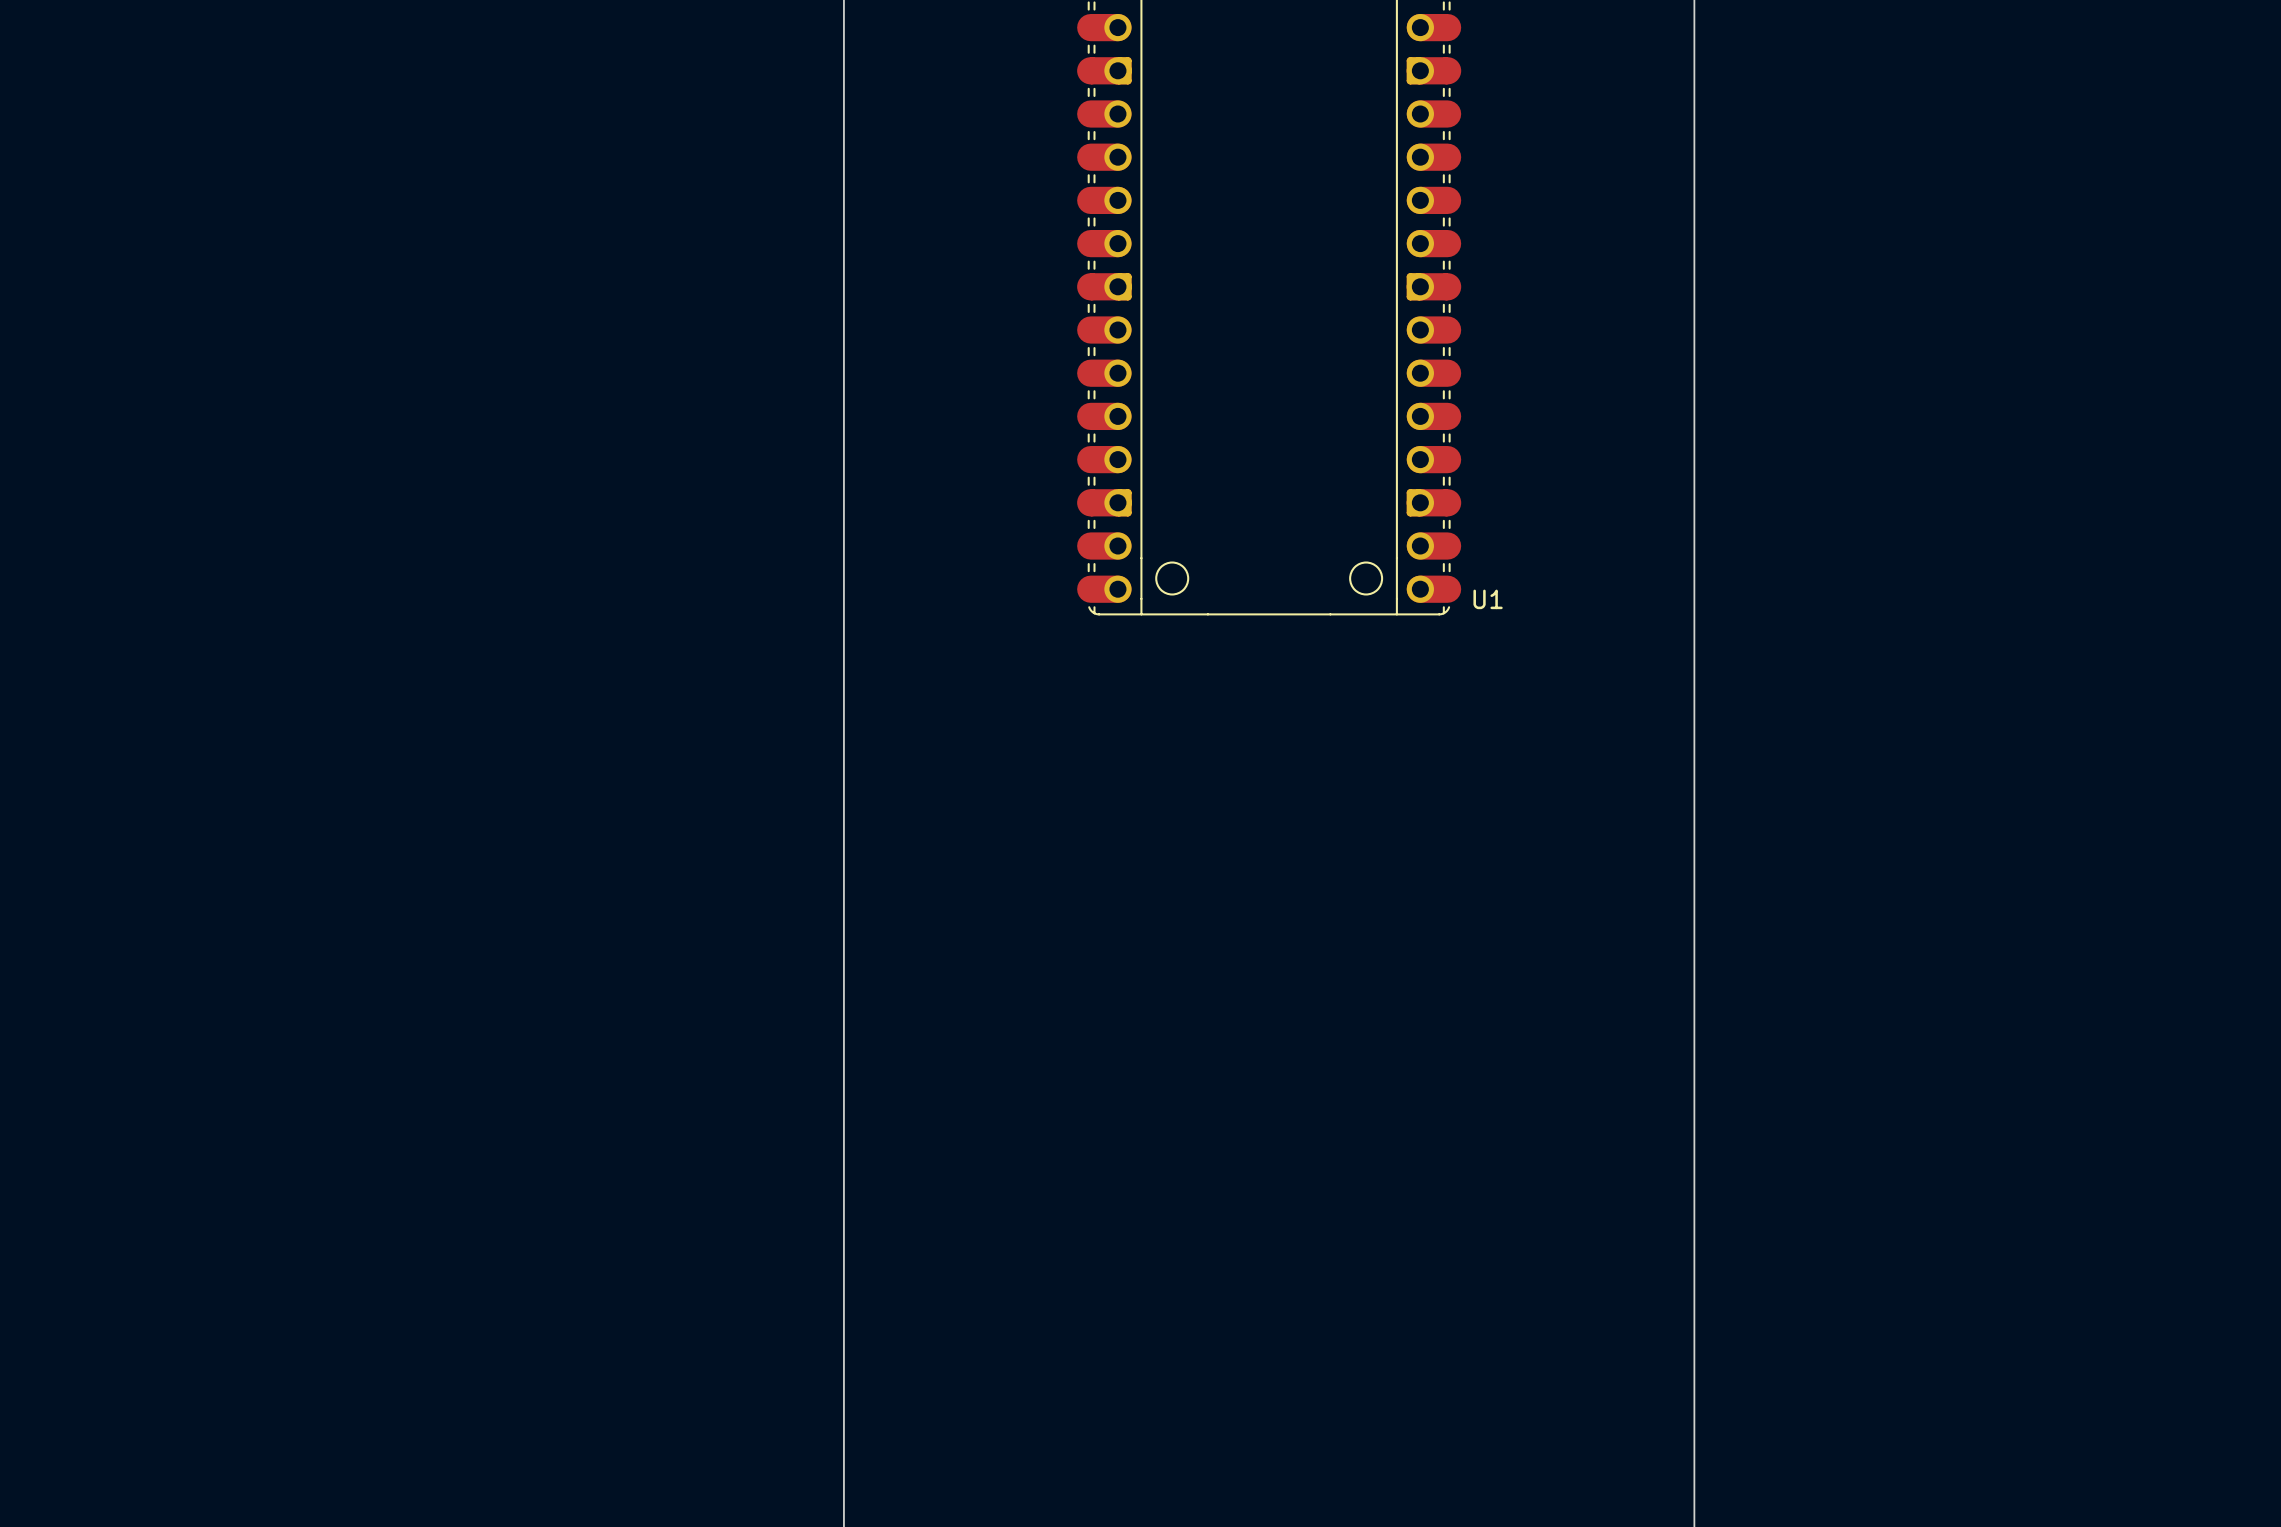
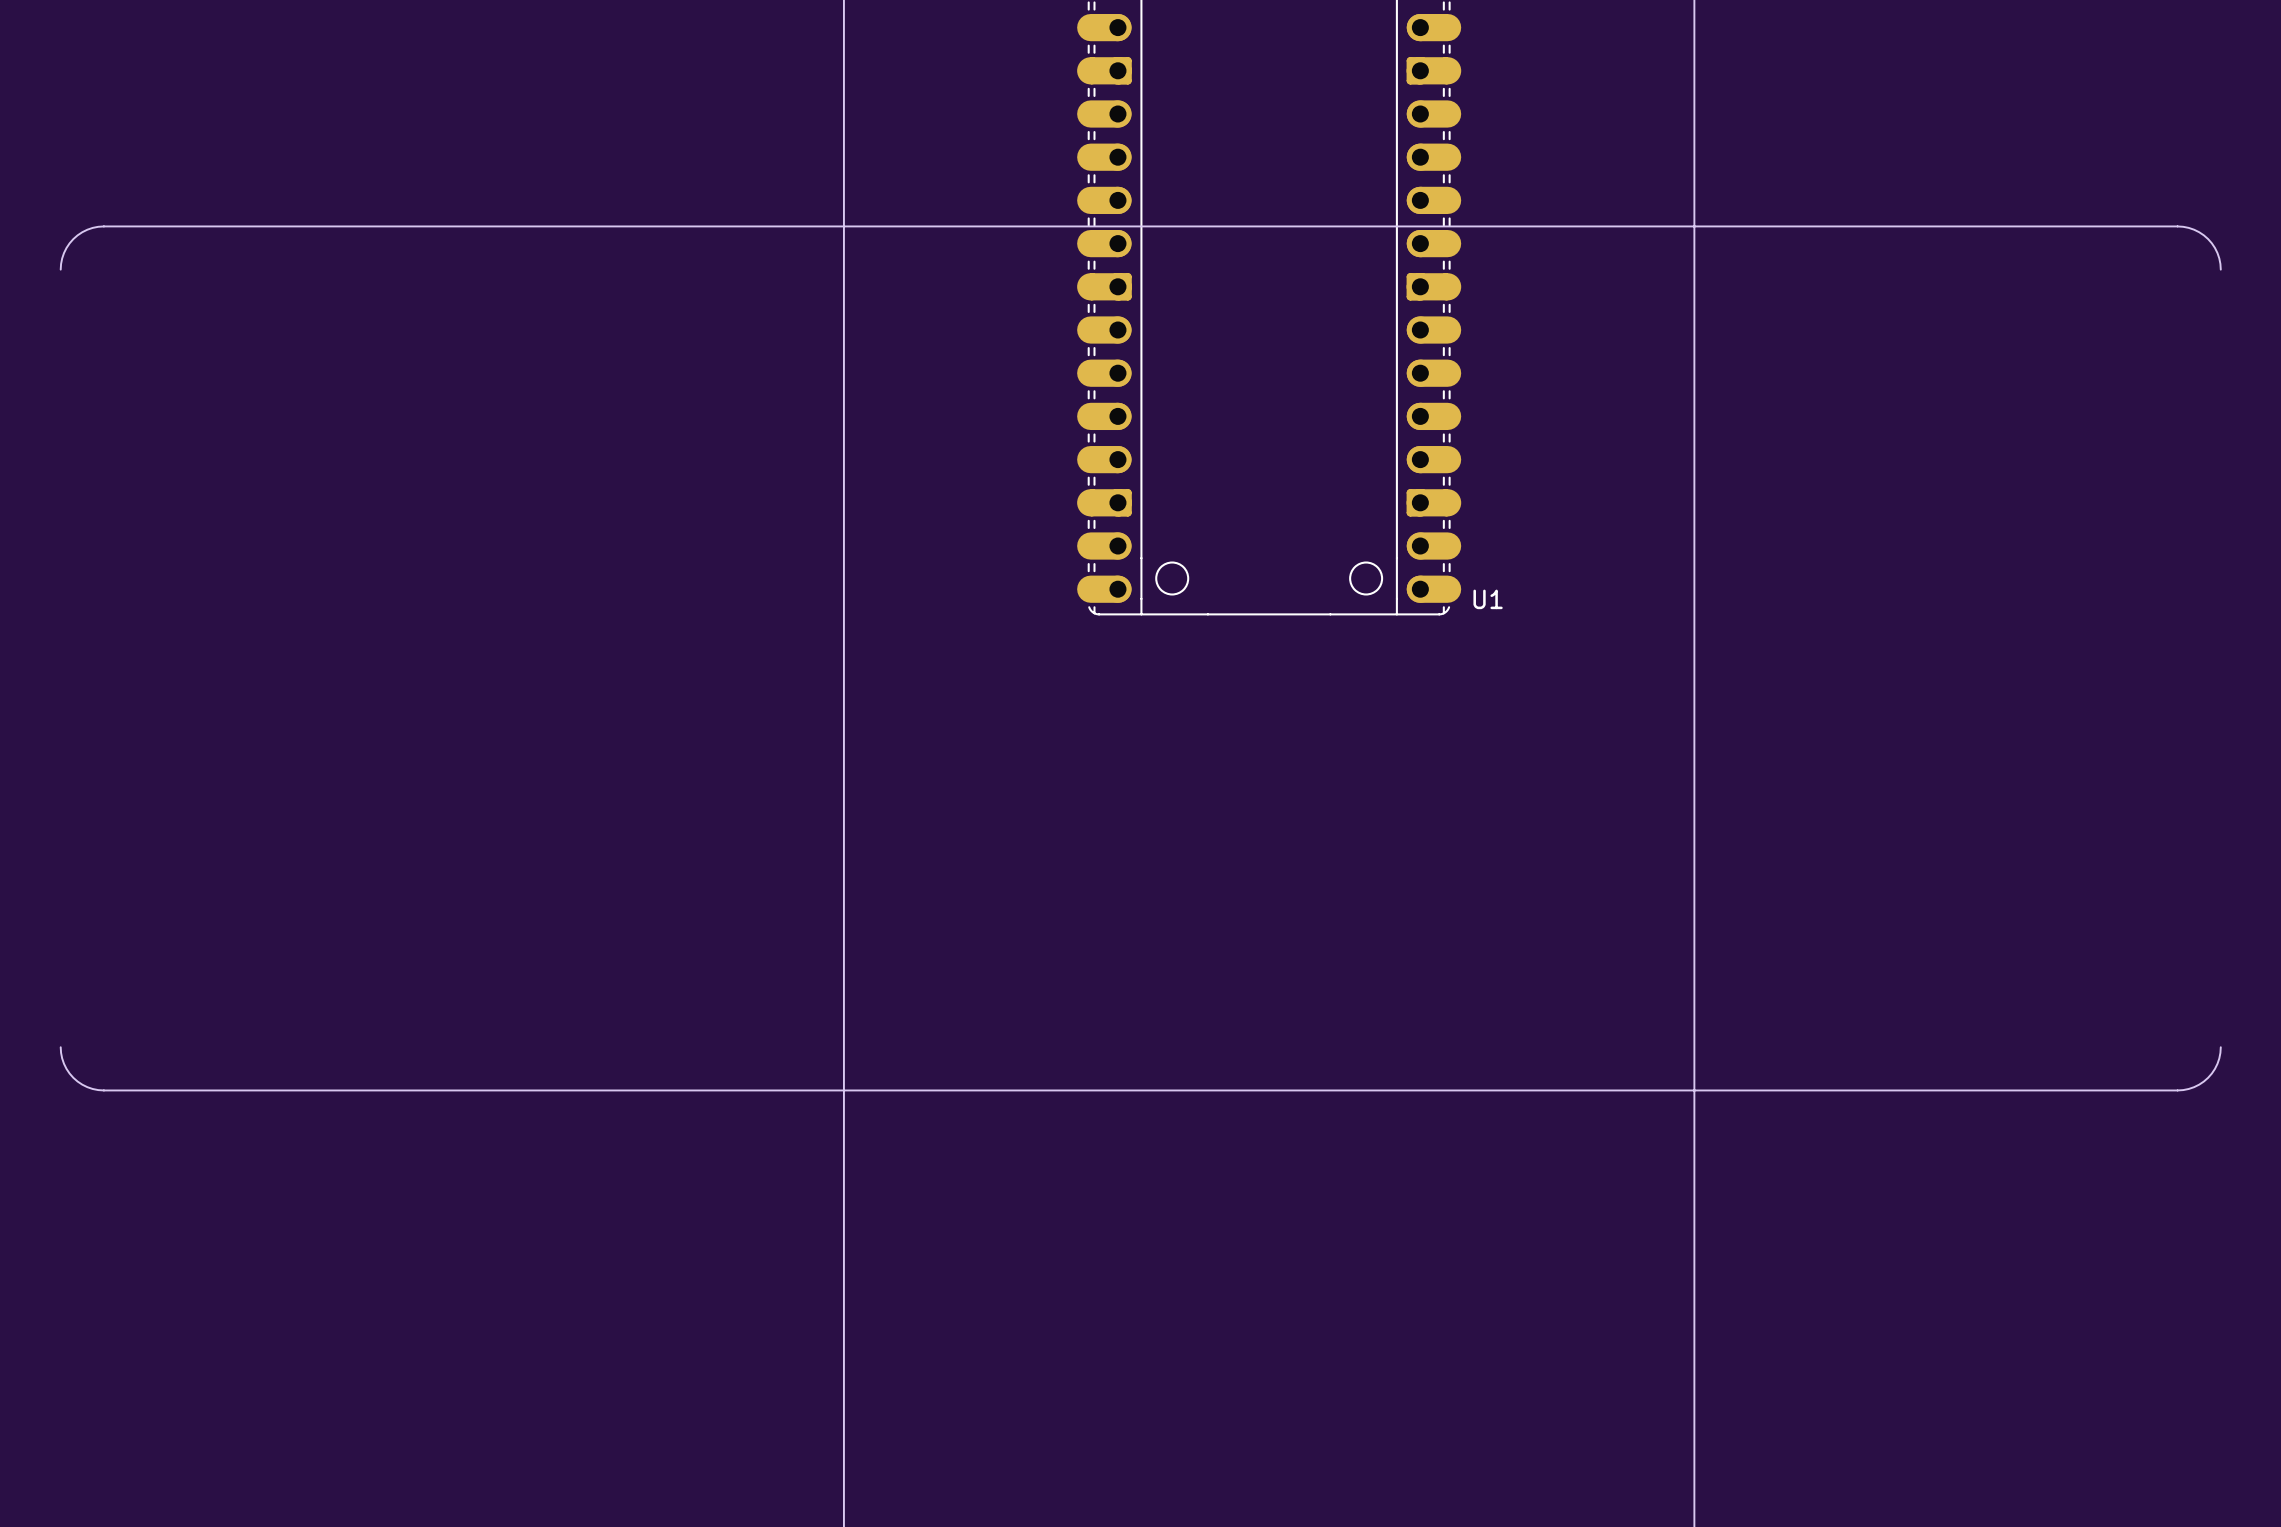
board edge: none -> (60, 269) (63, 253) (73, 239) (87, 229) (103, 226) (2177, 226) (2194, 229) (2208, 239) (2217, 253) (2220, 269)
board edge: none -> (60, 1047) (63, 1063) (73, 1077) (87, 1087) (103, 1090) (2177, 1090) (2194, 1087) (2208, 1077) (2217, 1063) (2220, 1047)

